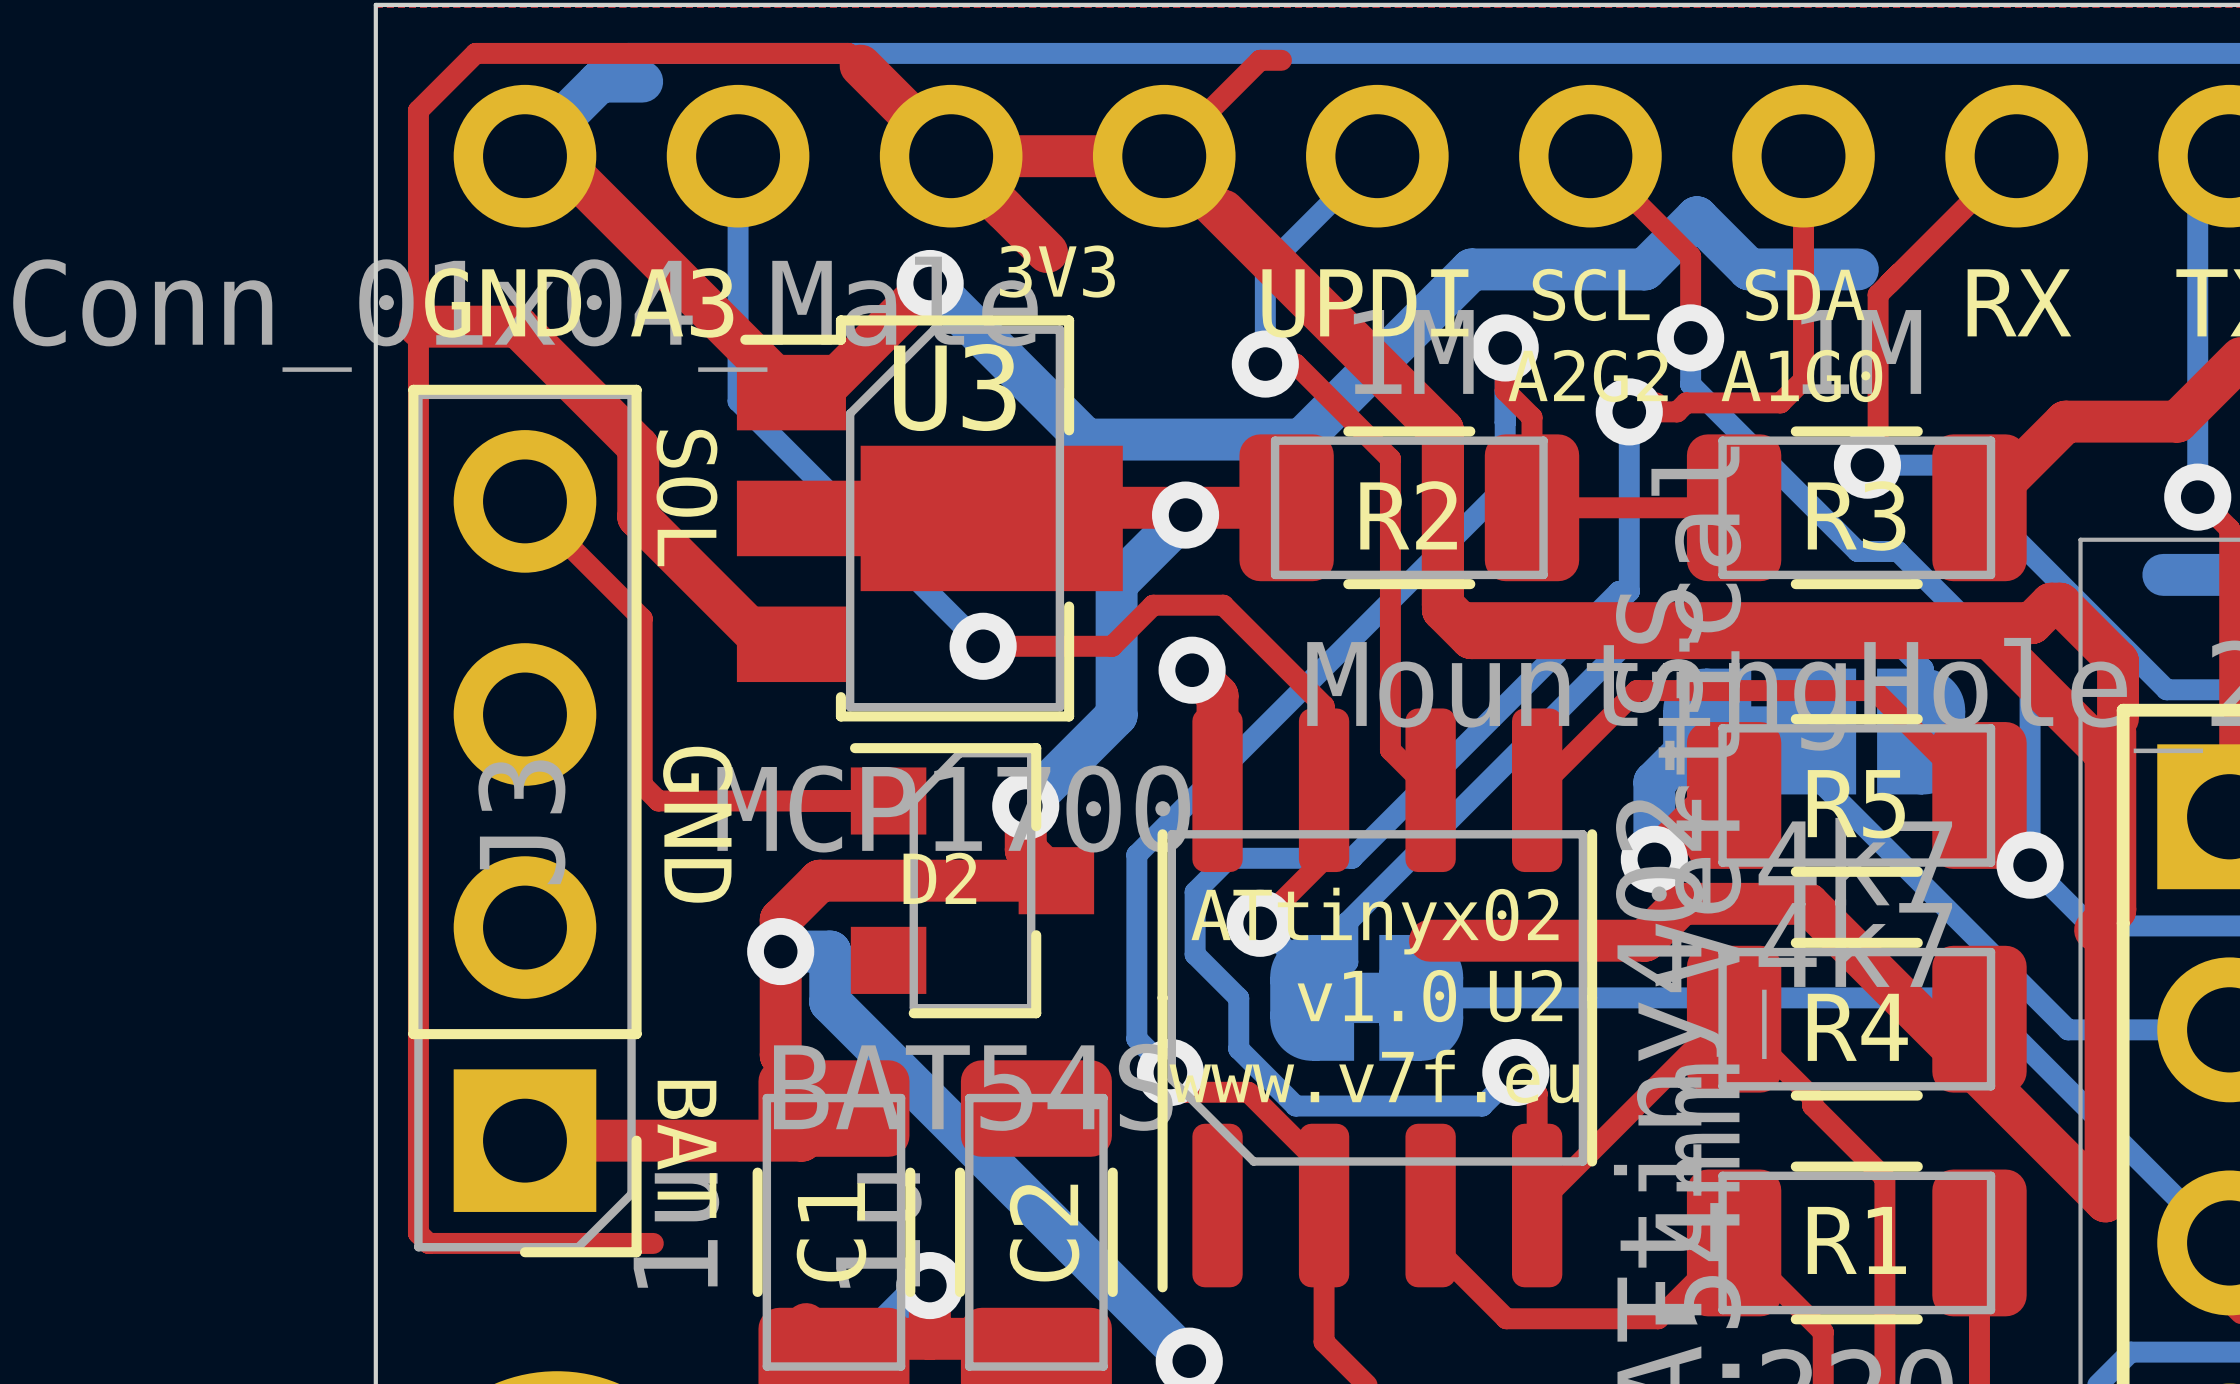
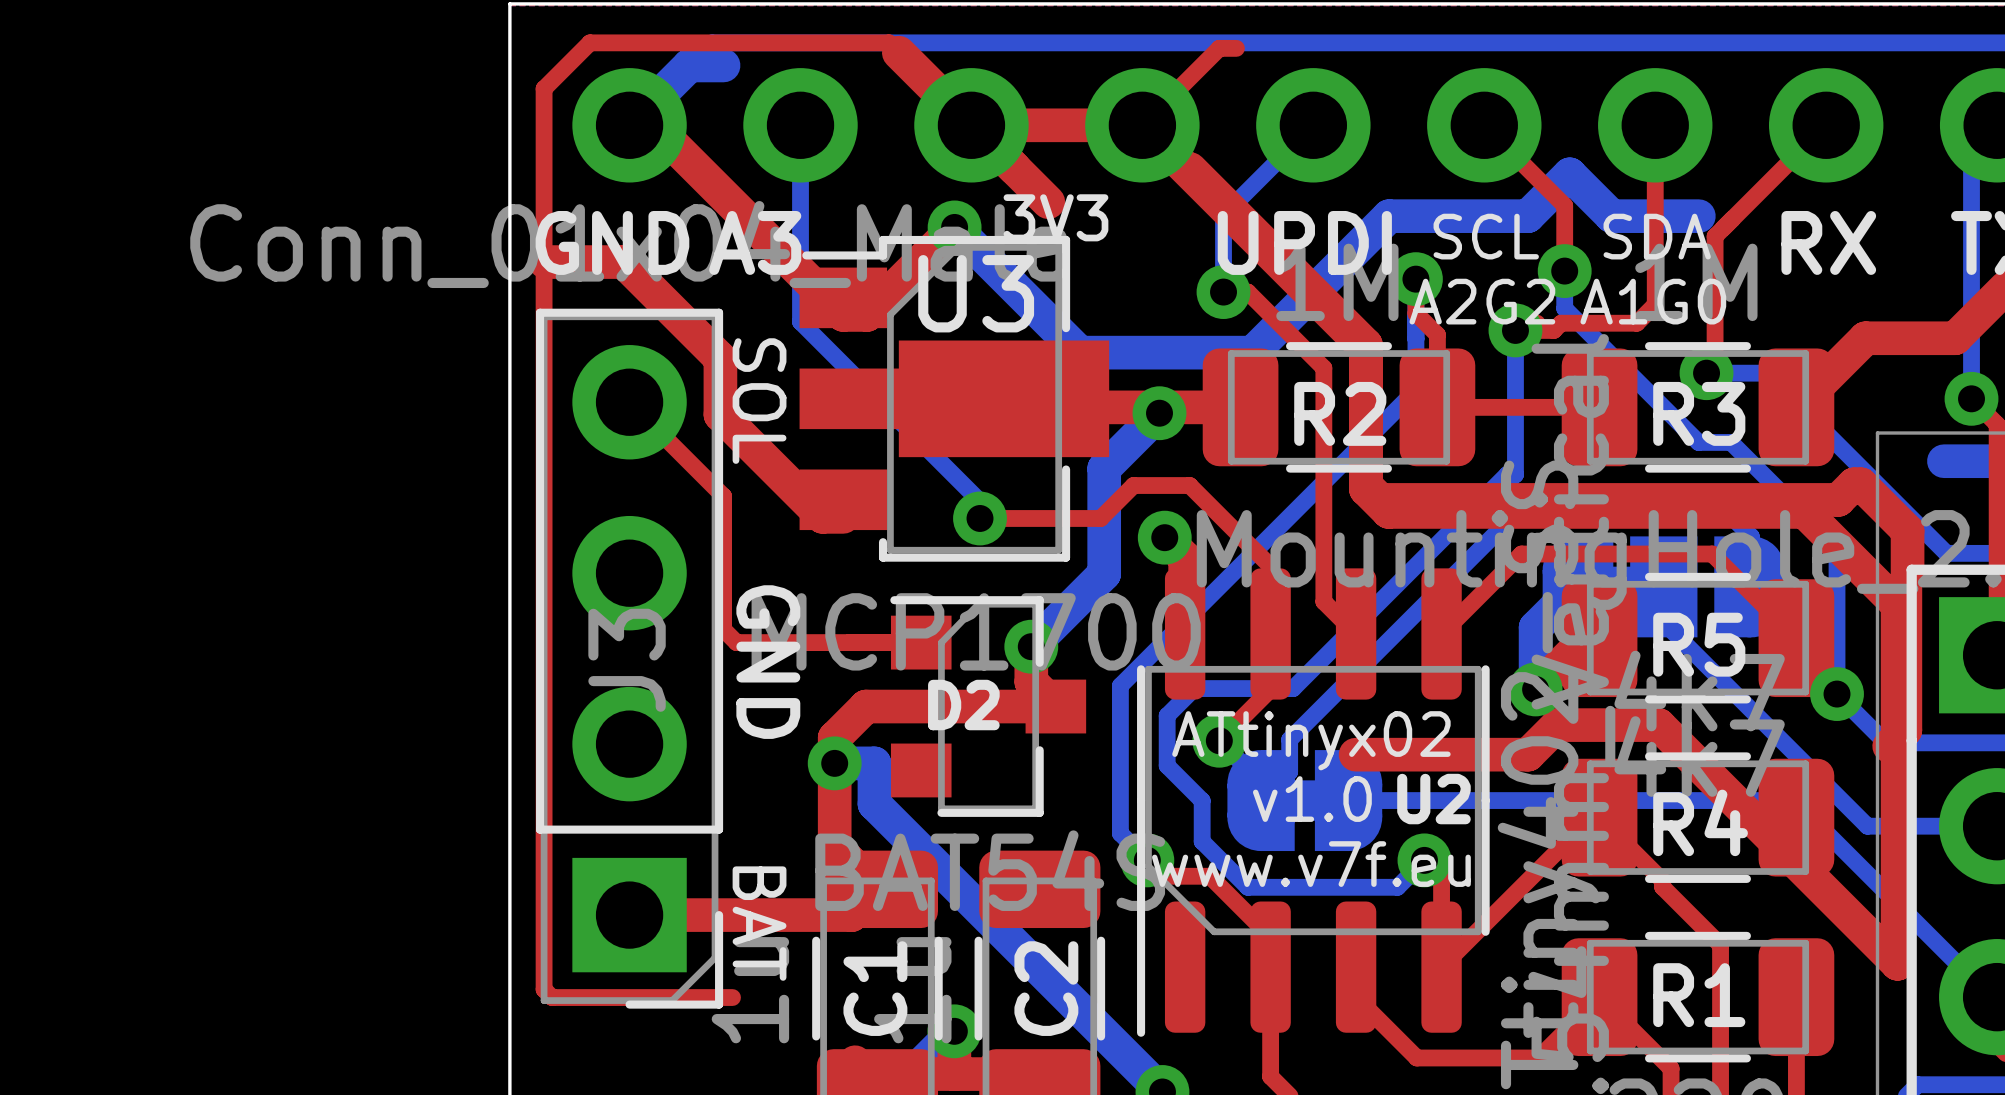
U3 position: (929, 518) -> (954, 398)
via position: (983, 646) -> (980, 518)

